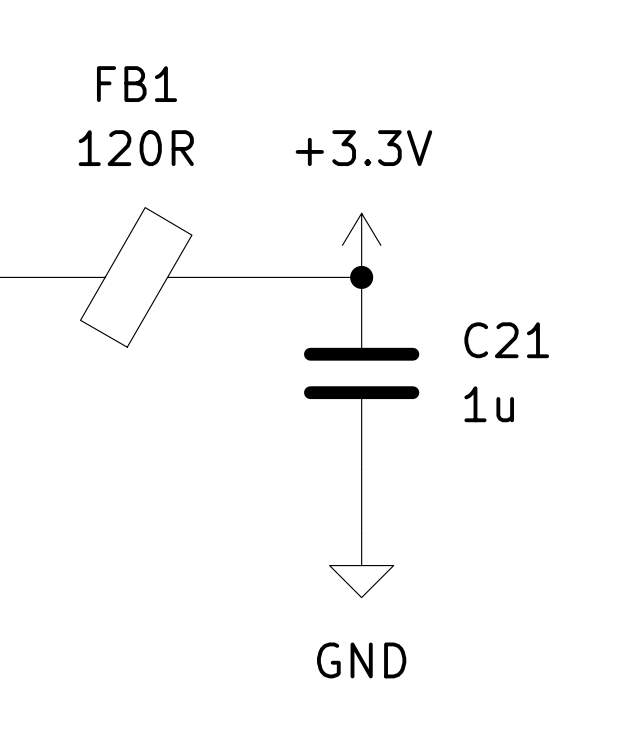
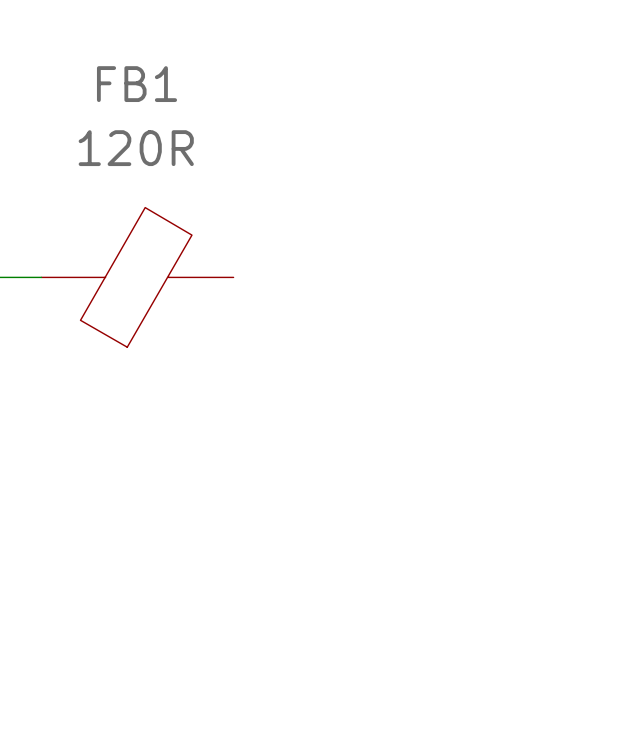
power symbol: +3.3V (361, 245) -> none
wire: (233, 277) (361, 277) -> none
junction: (361, 277) -> none
C21: 1u (361, 373) -> none
wire: (361, 469) (361, 533) -> none
power symbol: GND (361, 565) -> none

